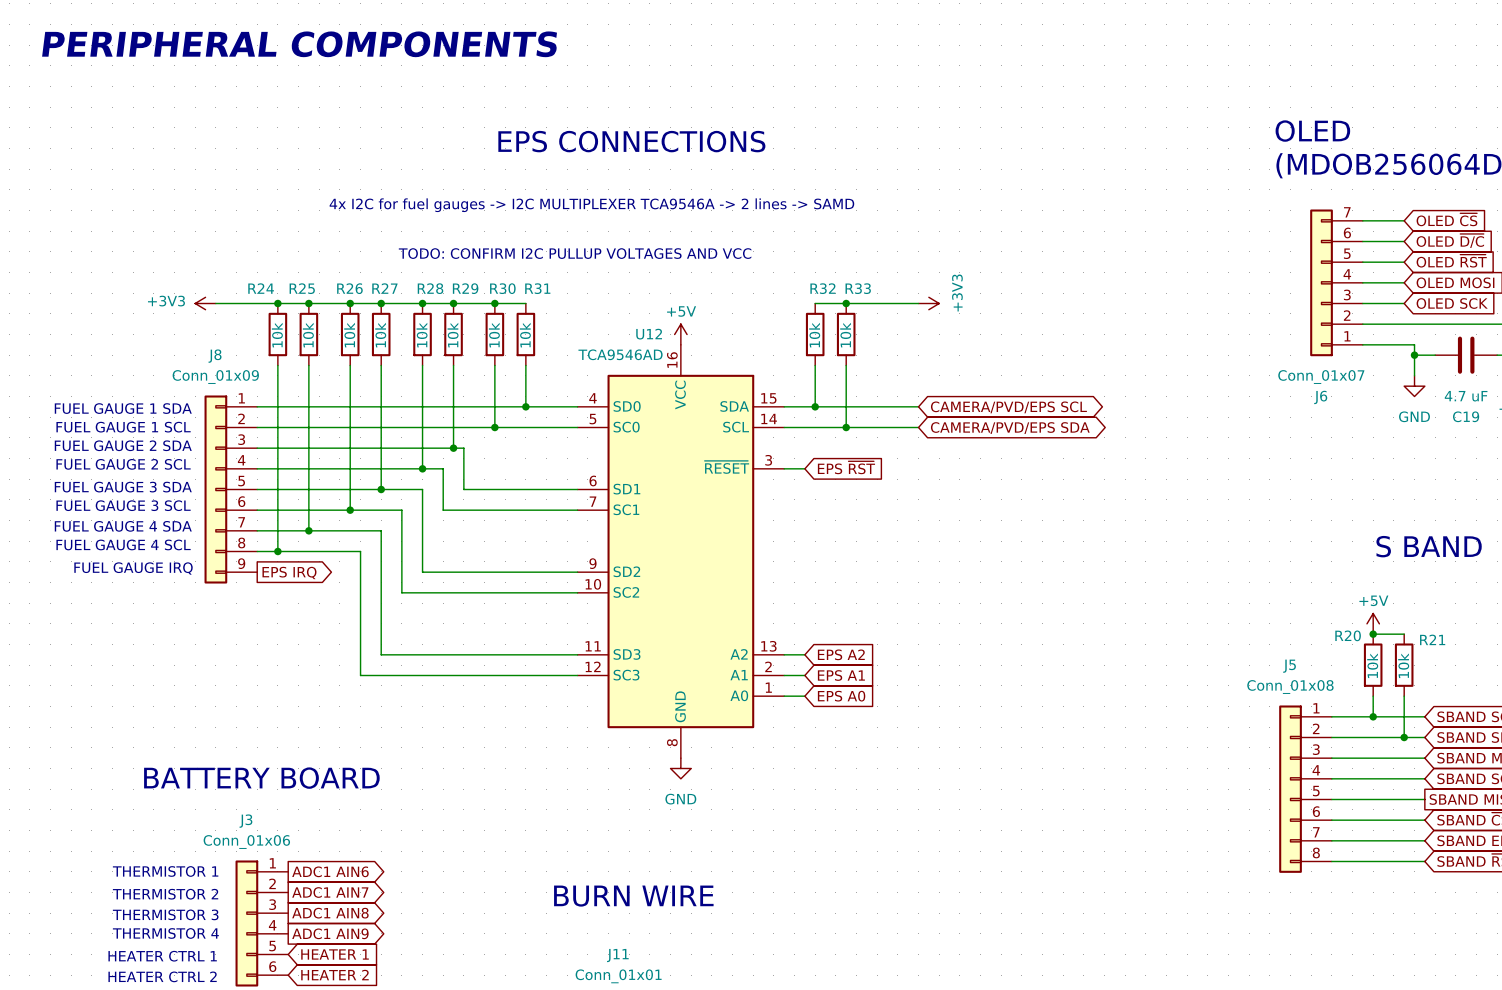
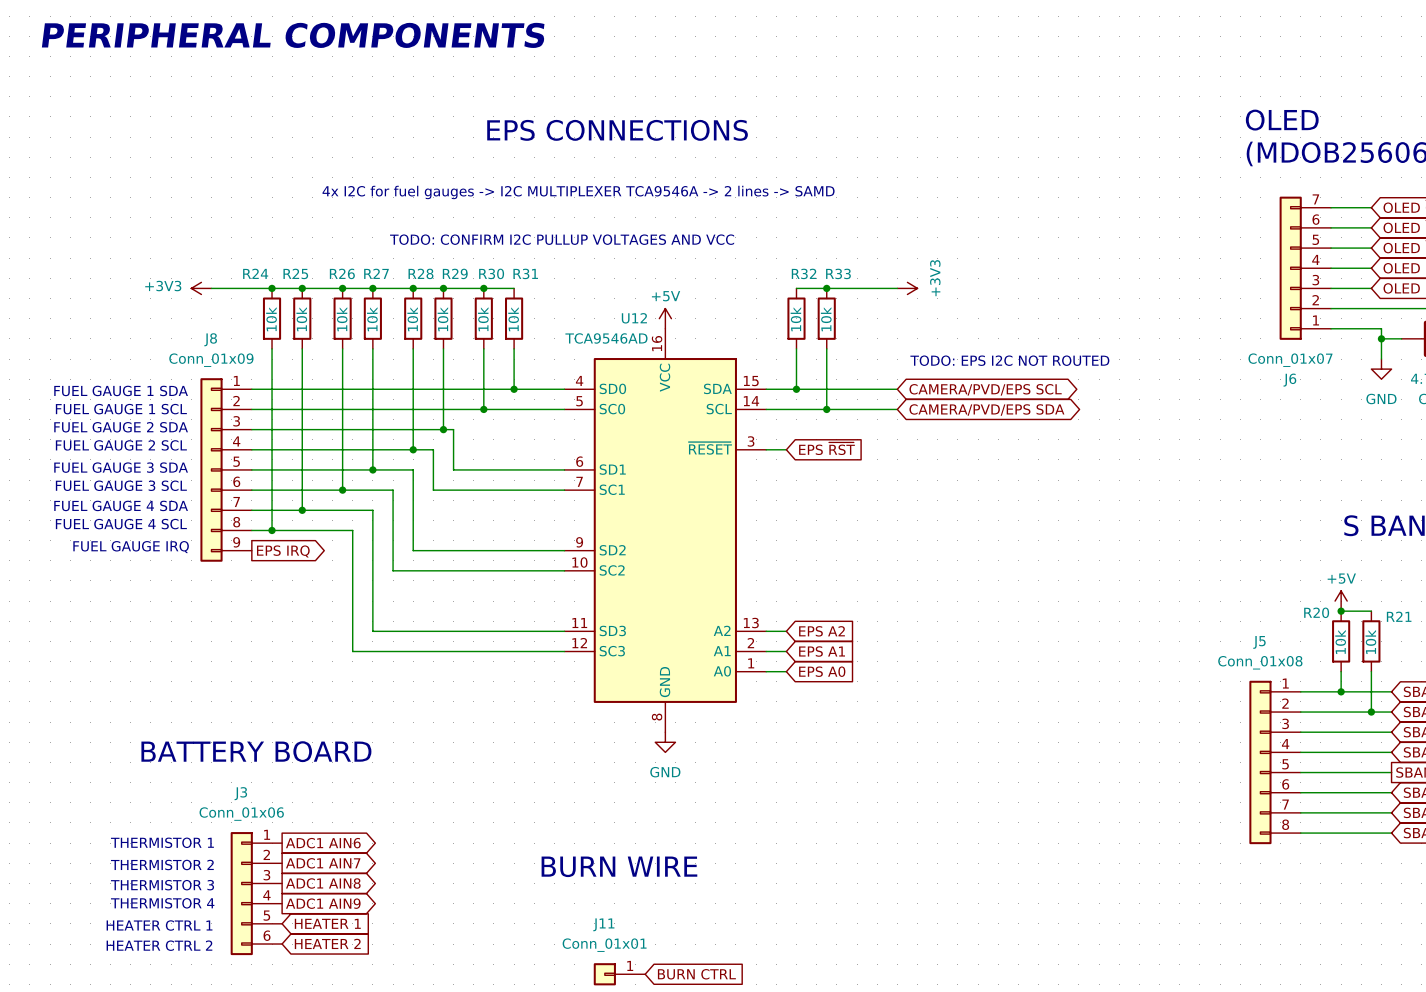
text: none -> TODO: EPS I2C NOT ROUTED (1009, 360)

